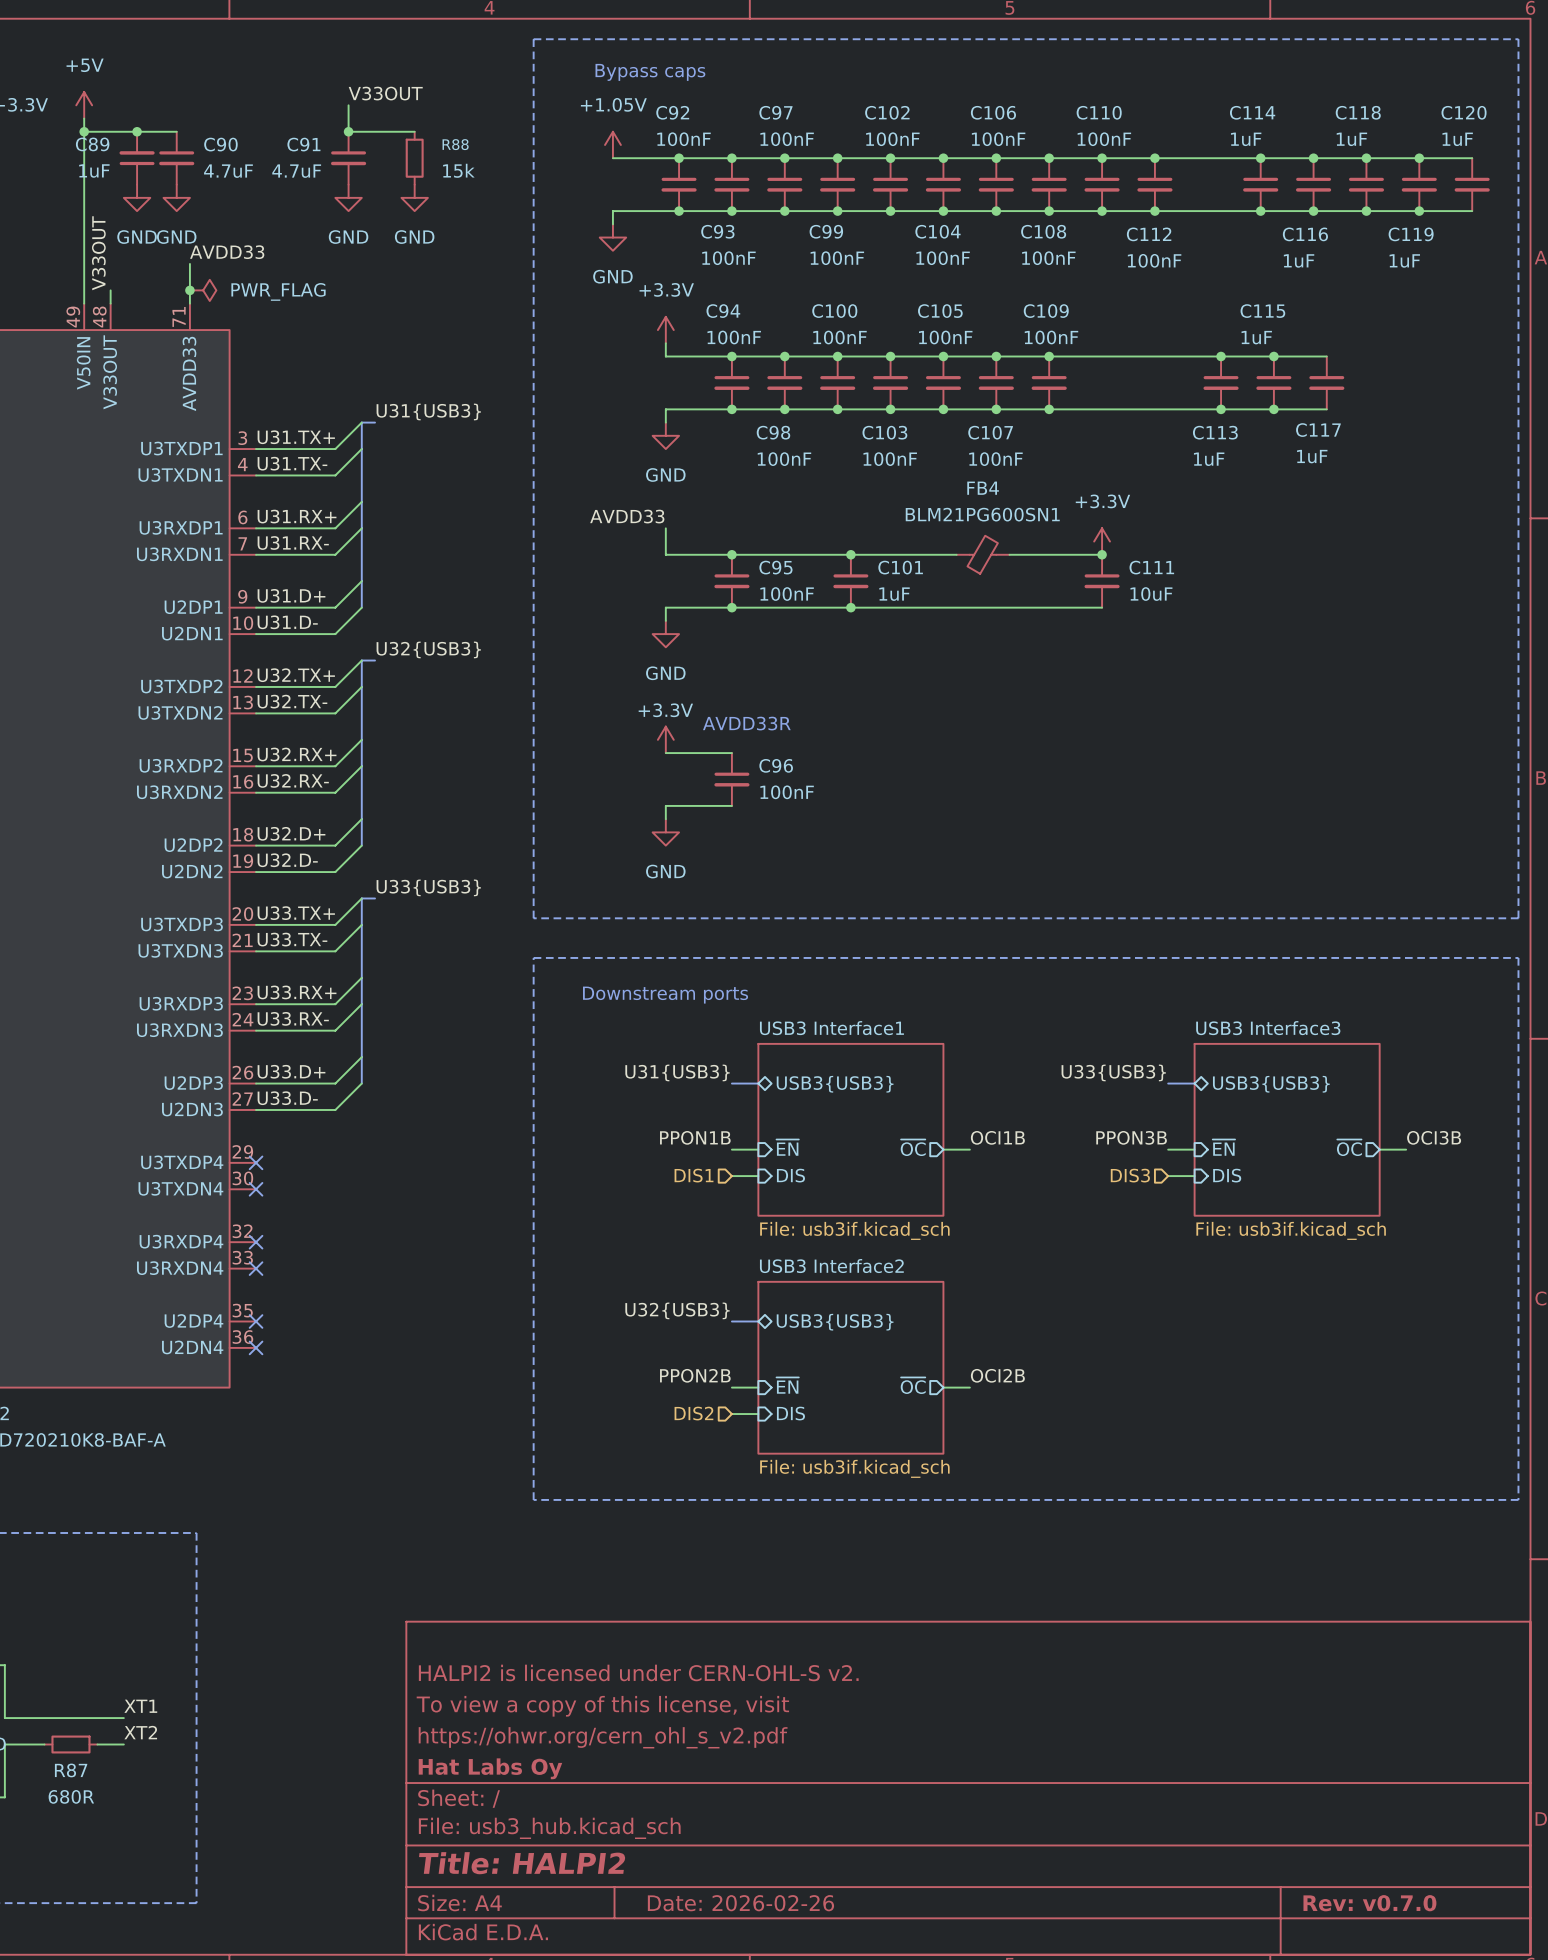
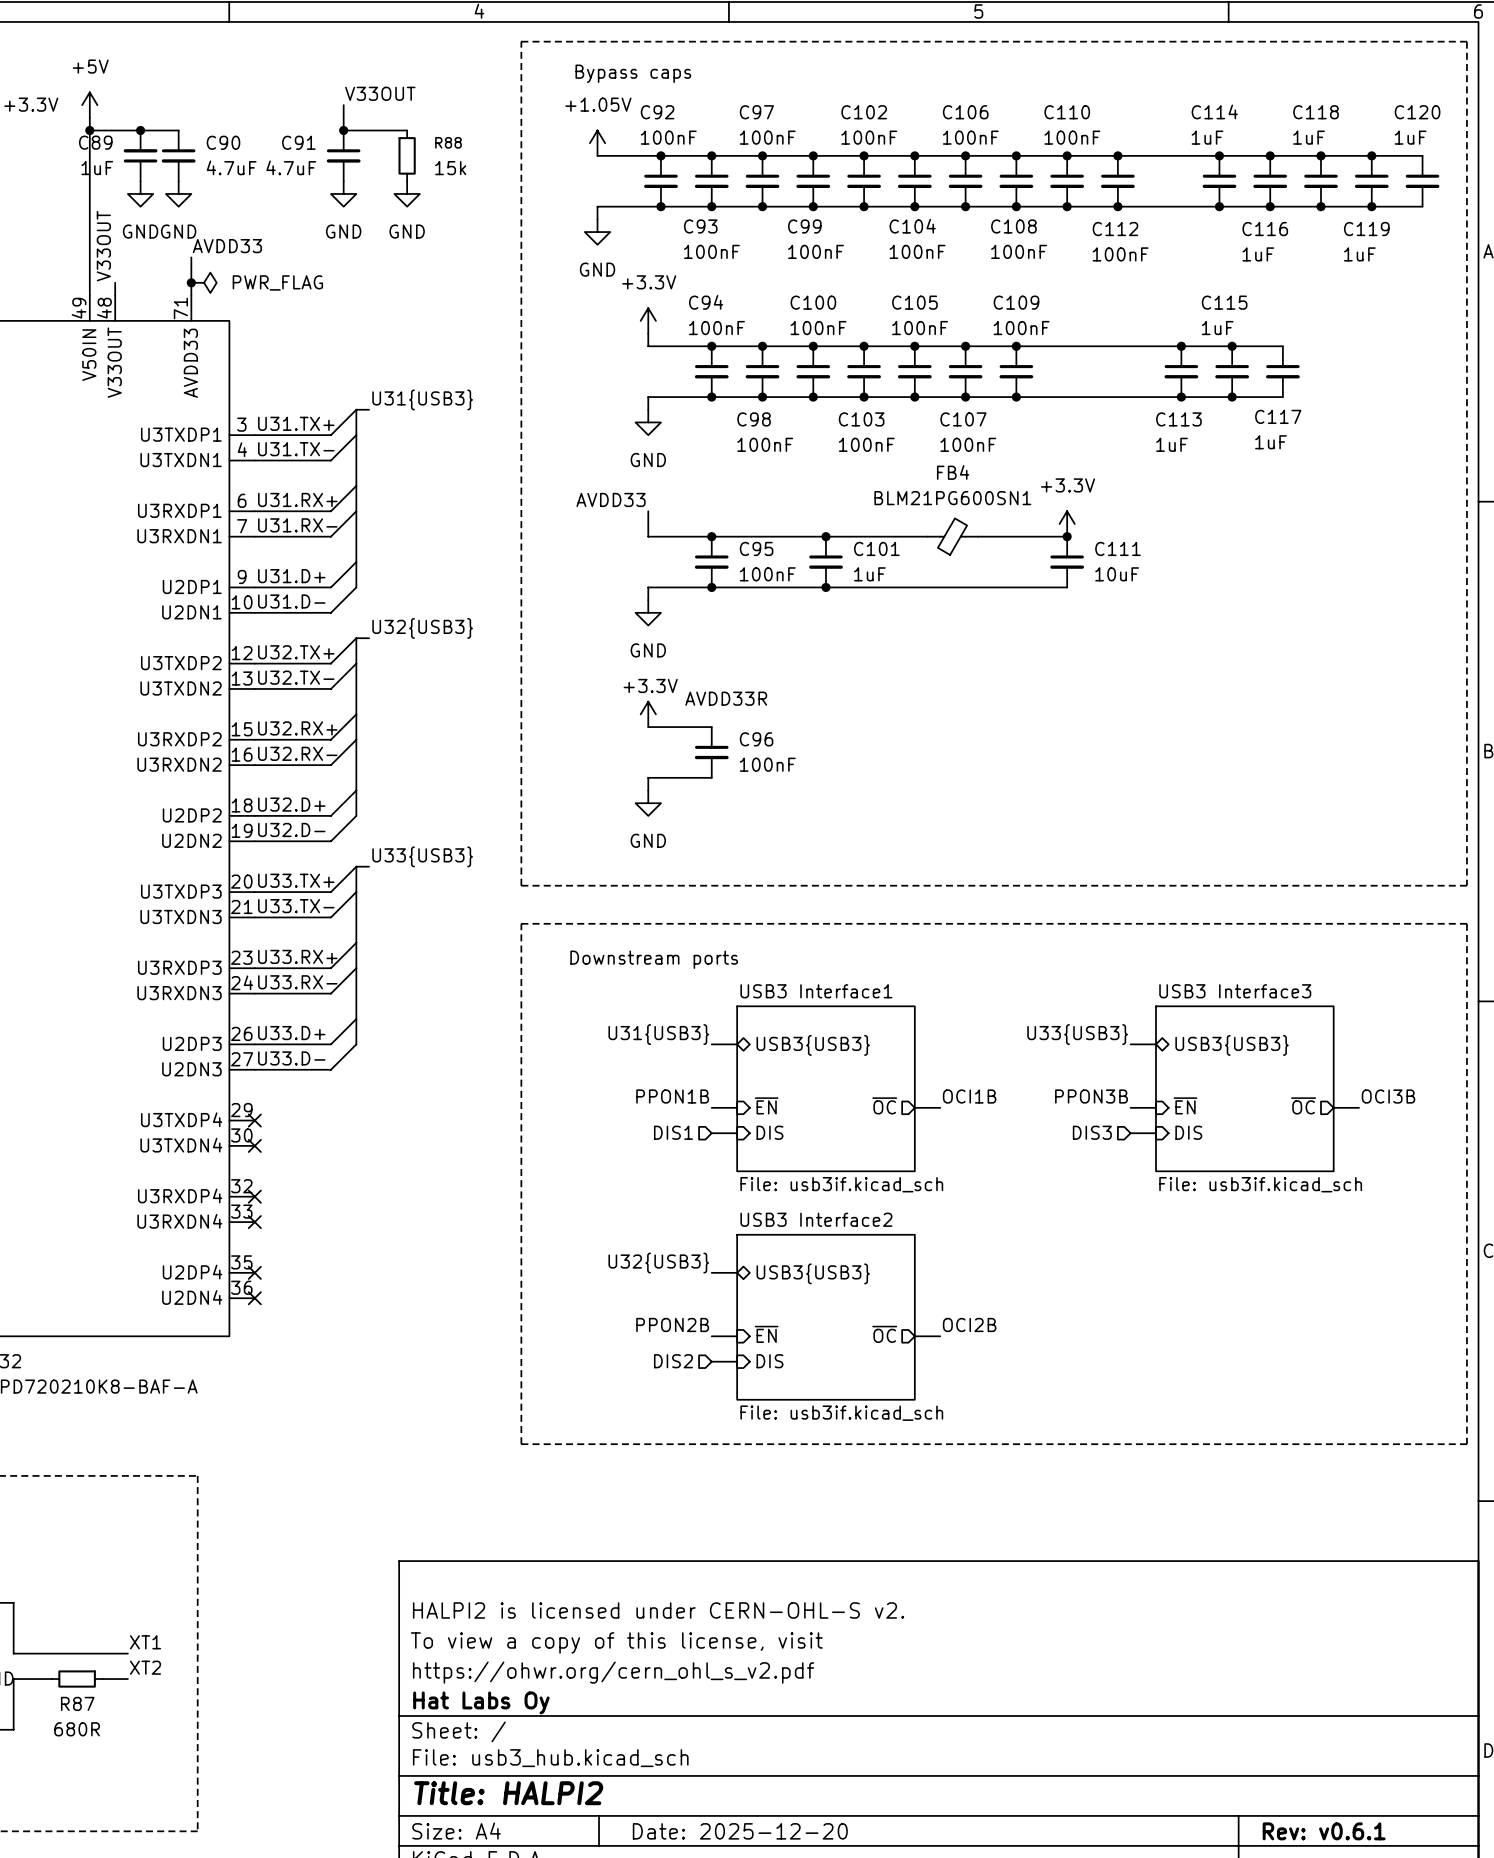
title block: Date: 2026-02-26 (740, 1903) -> Date: 2025-12-20 (740, 1831)
title block: Rev: v0.7.0 (1369, 1903) -> Rev: v0.6.1 (1324, 1831)

